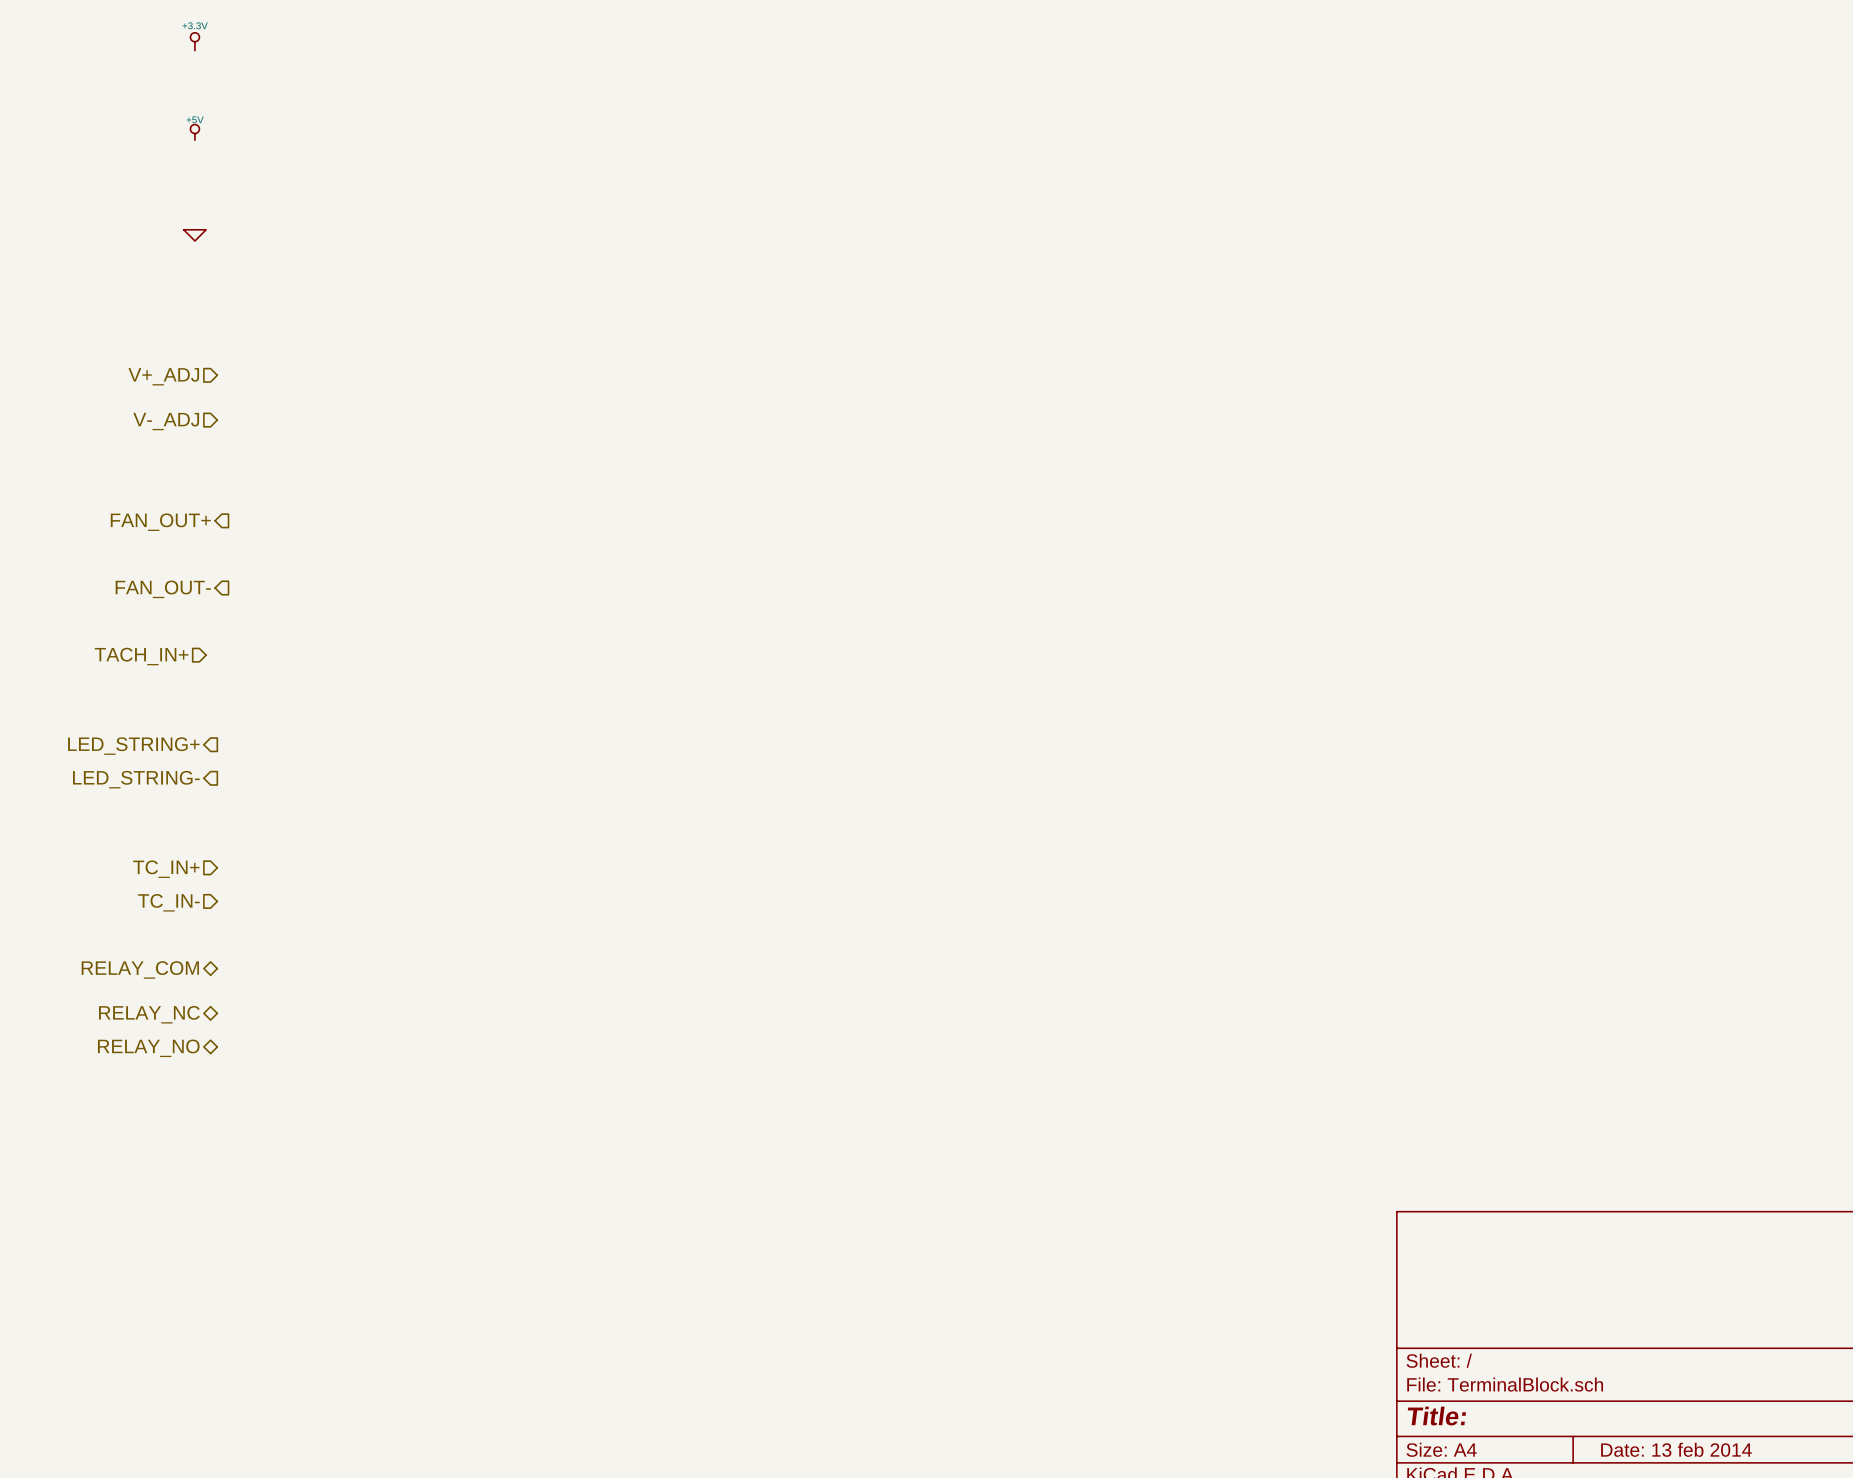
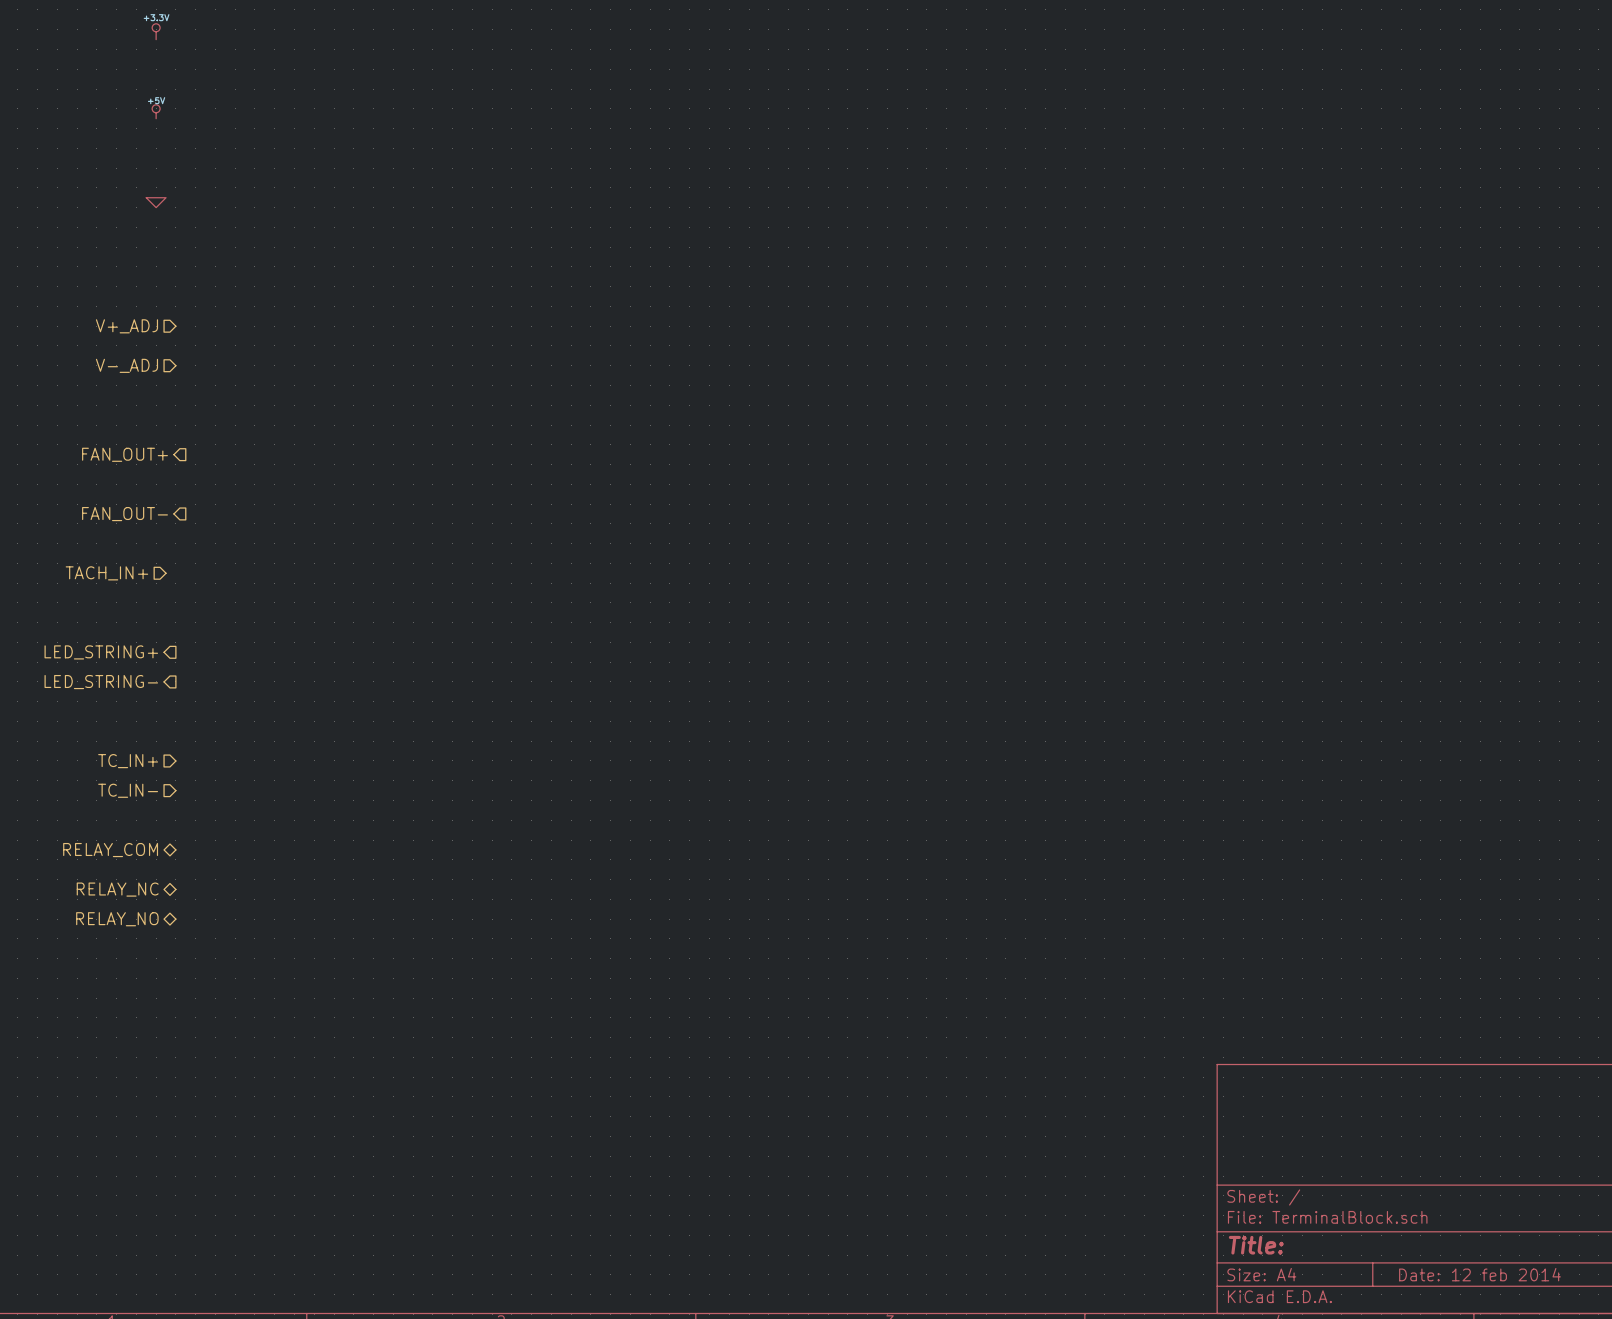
title block: Date: 13 feb 2014 (1676, 1449) -> Date: 12 feb 2014 (1479, 1274)

